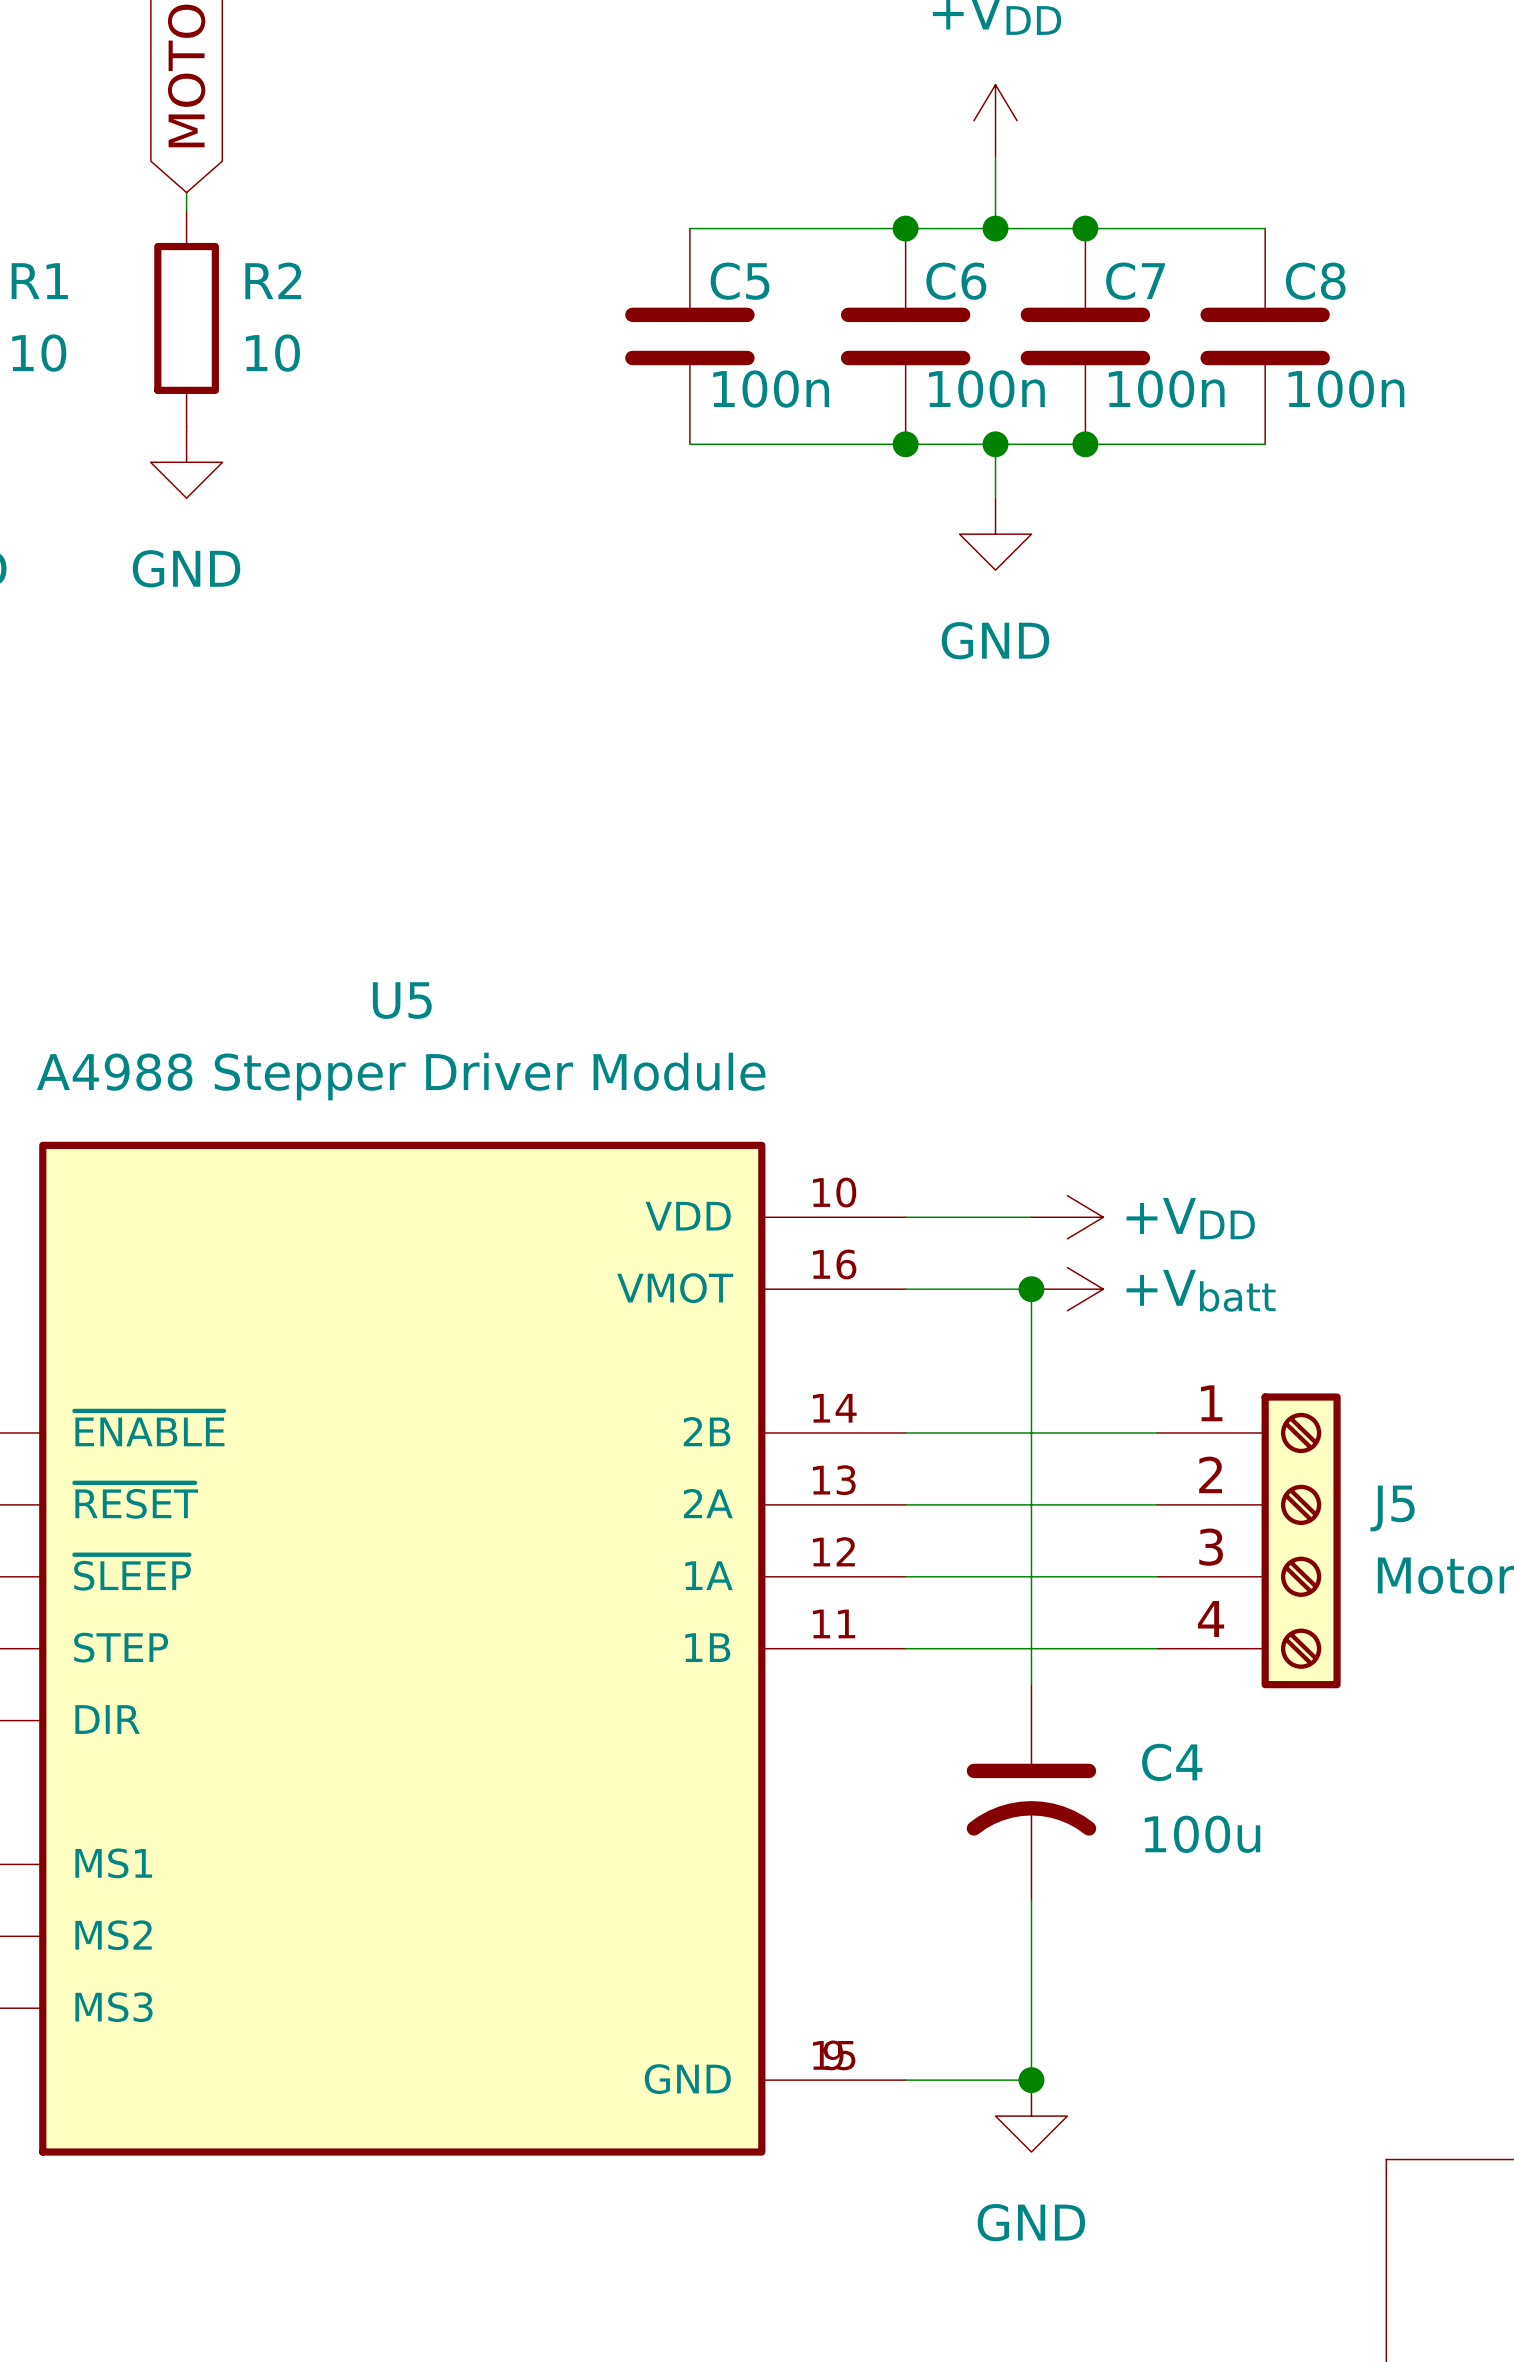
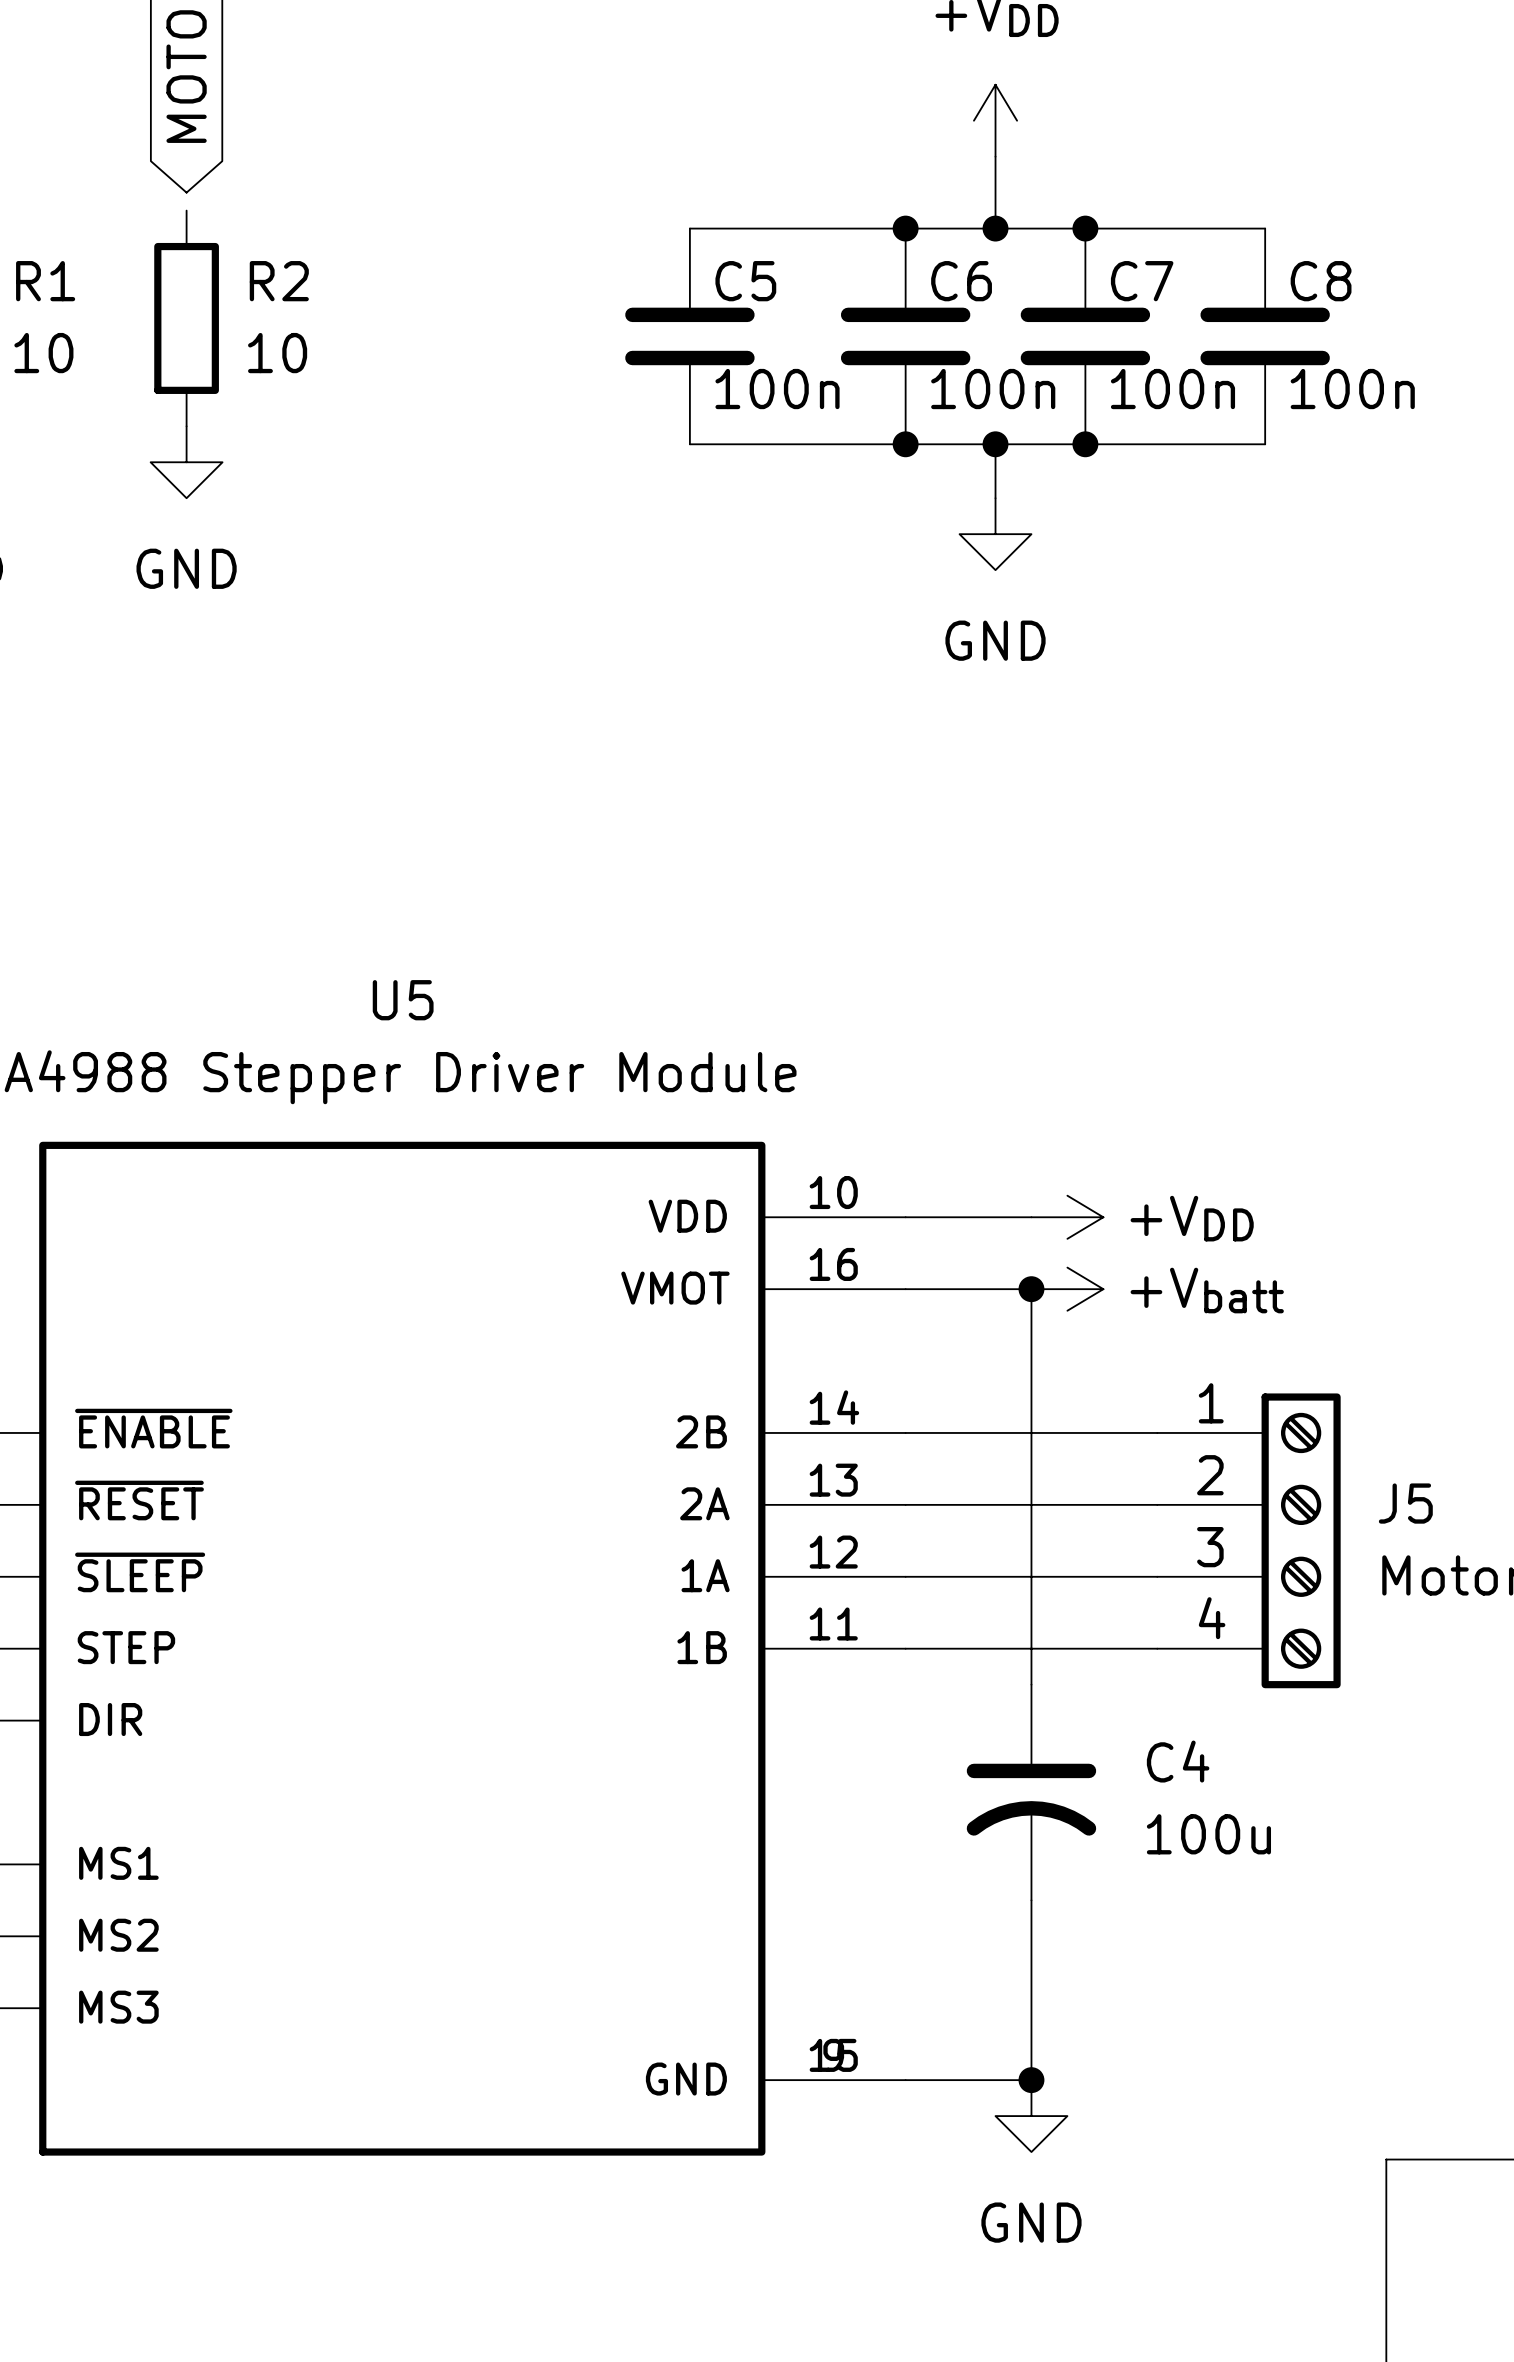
wire: (186, 192) (186, 210) -> none

